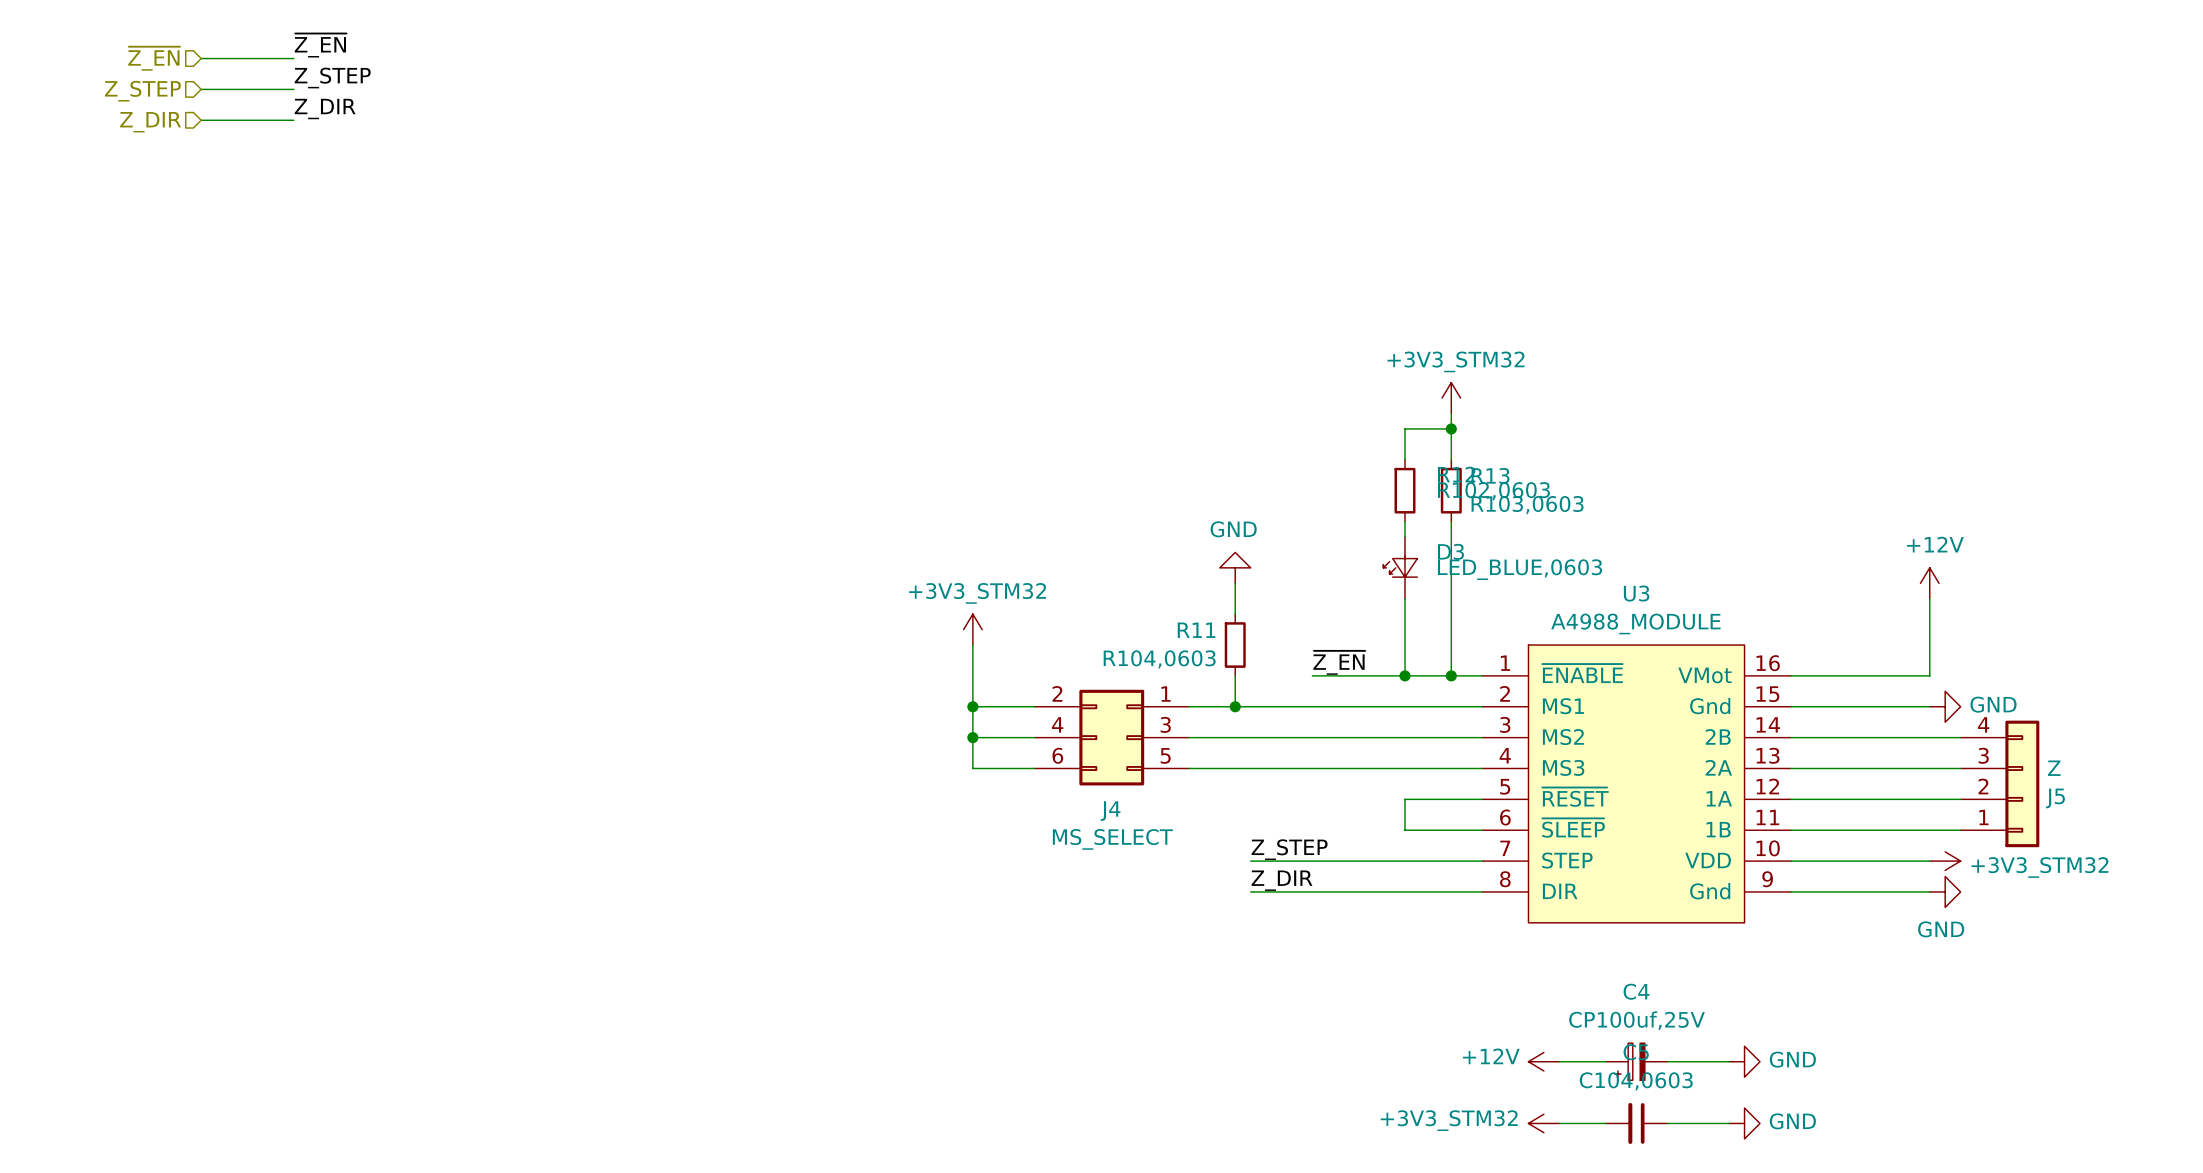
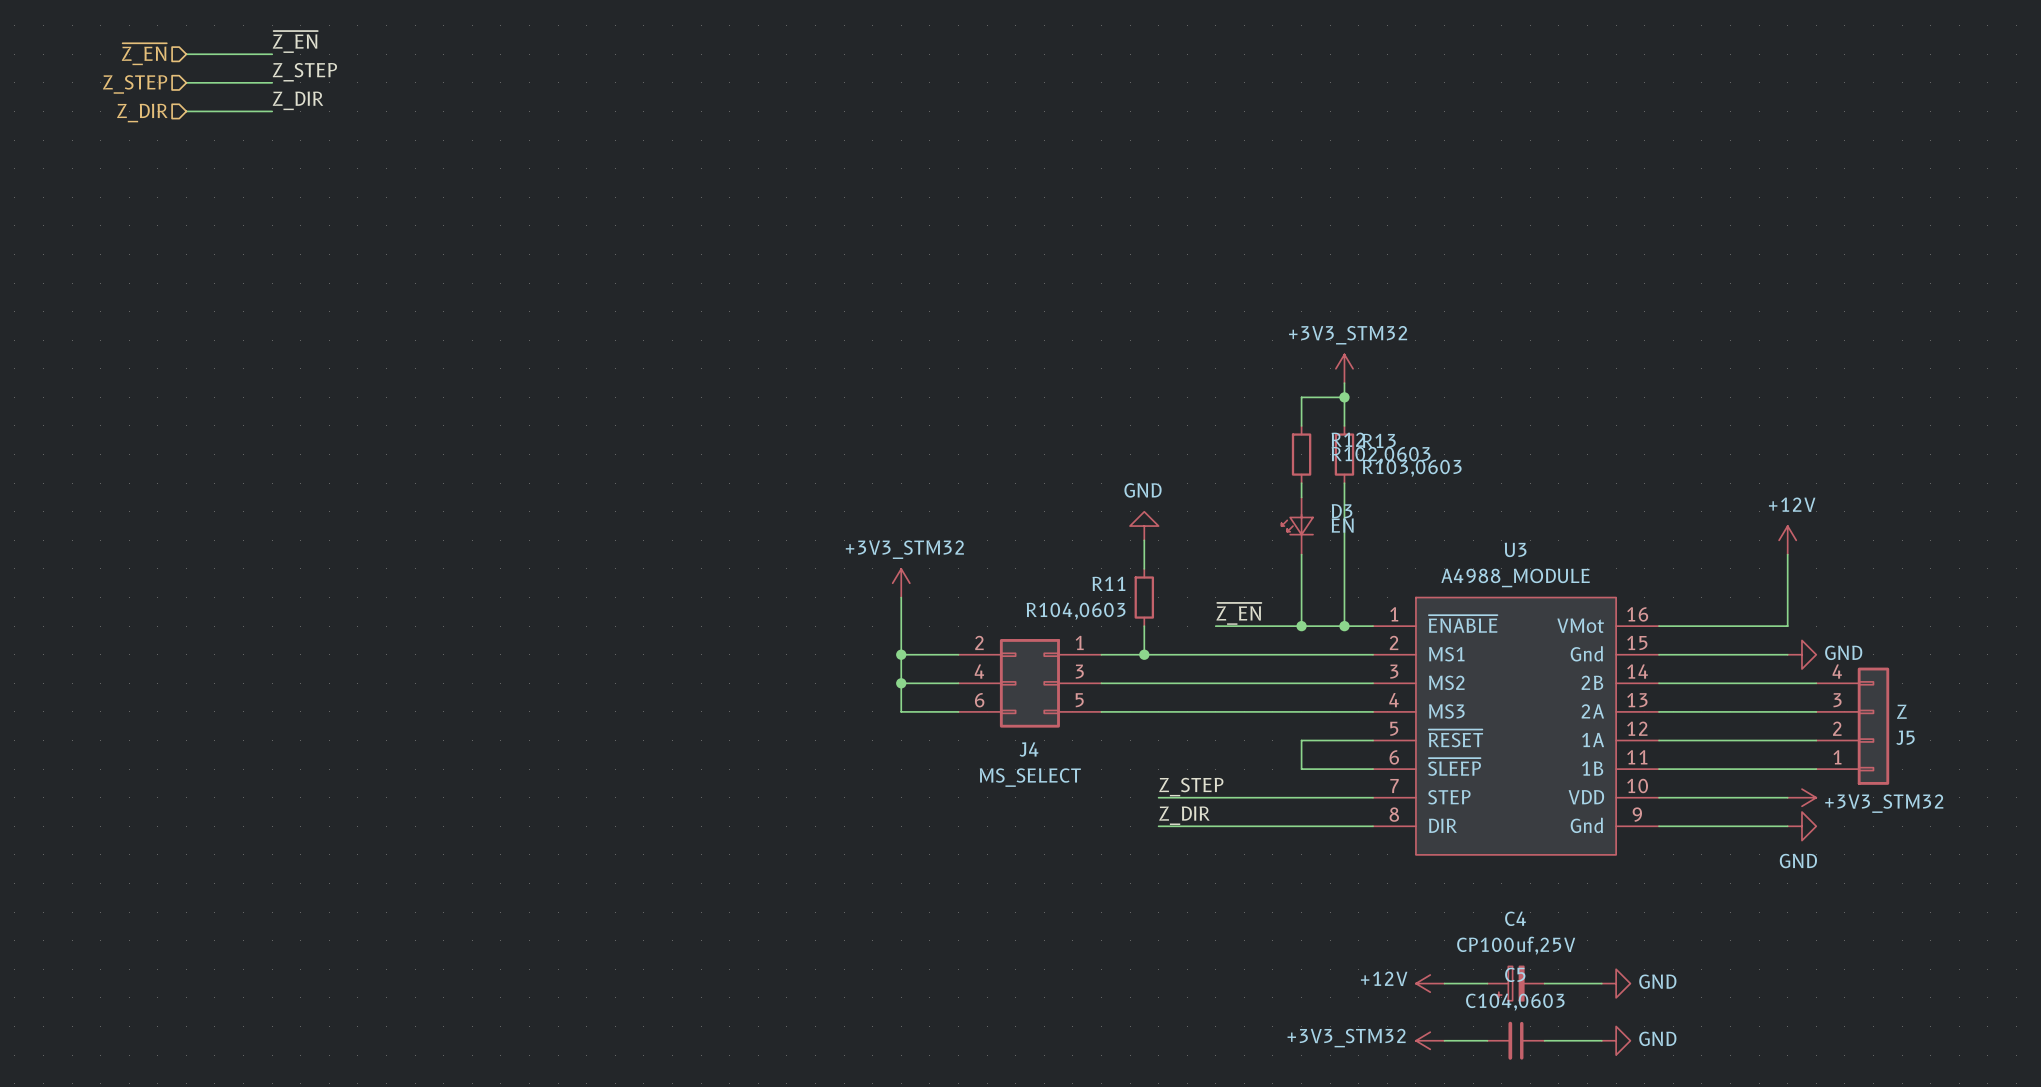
D3 value: LED_BLUE,0603 (1519, 569) -> EN (1342, 525)

